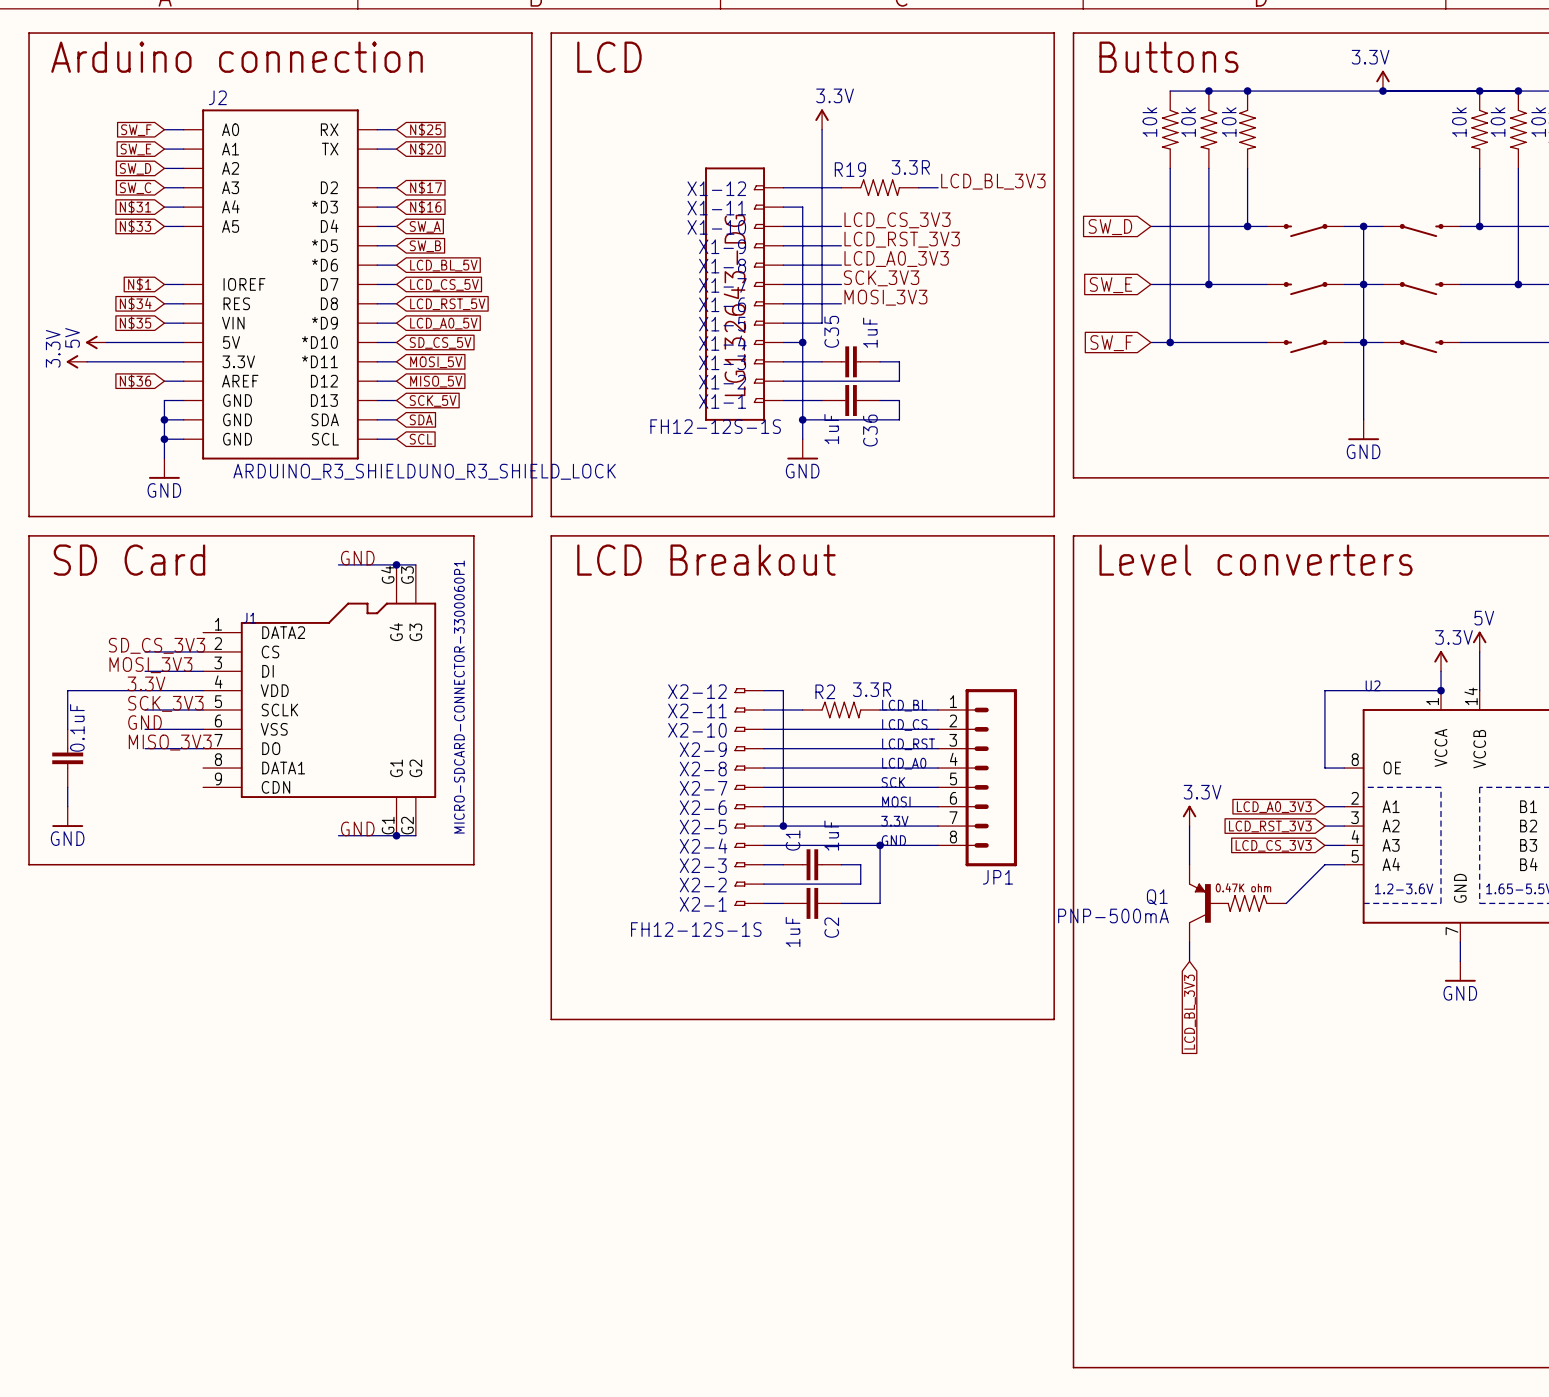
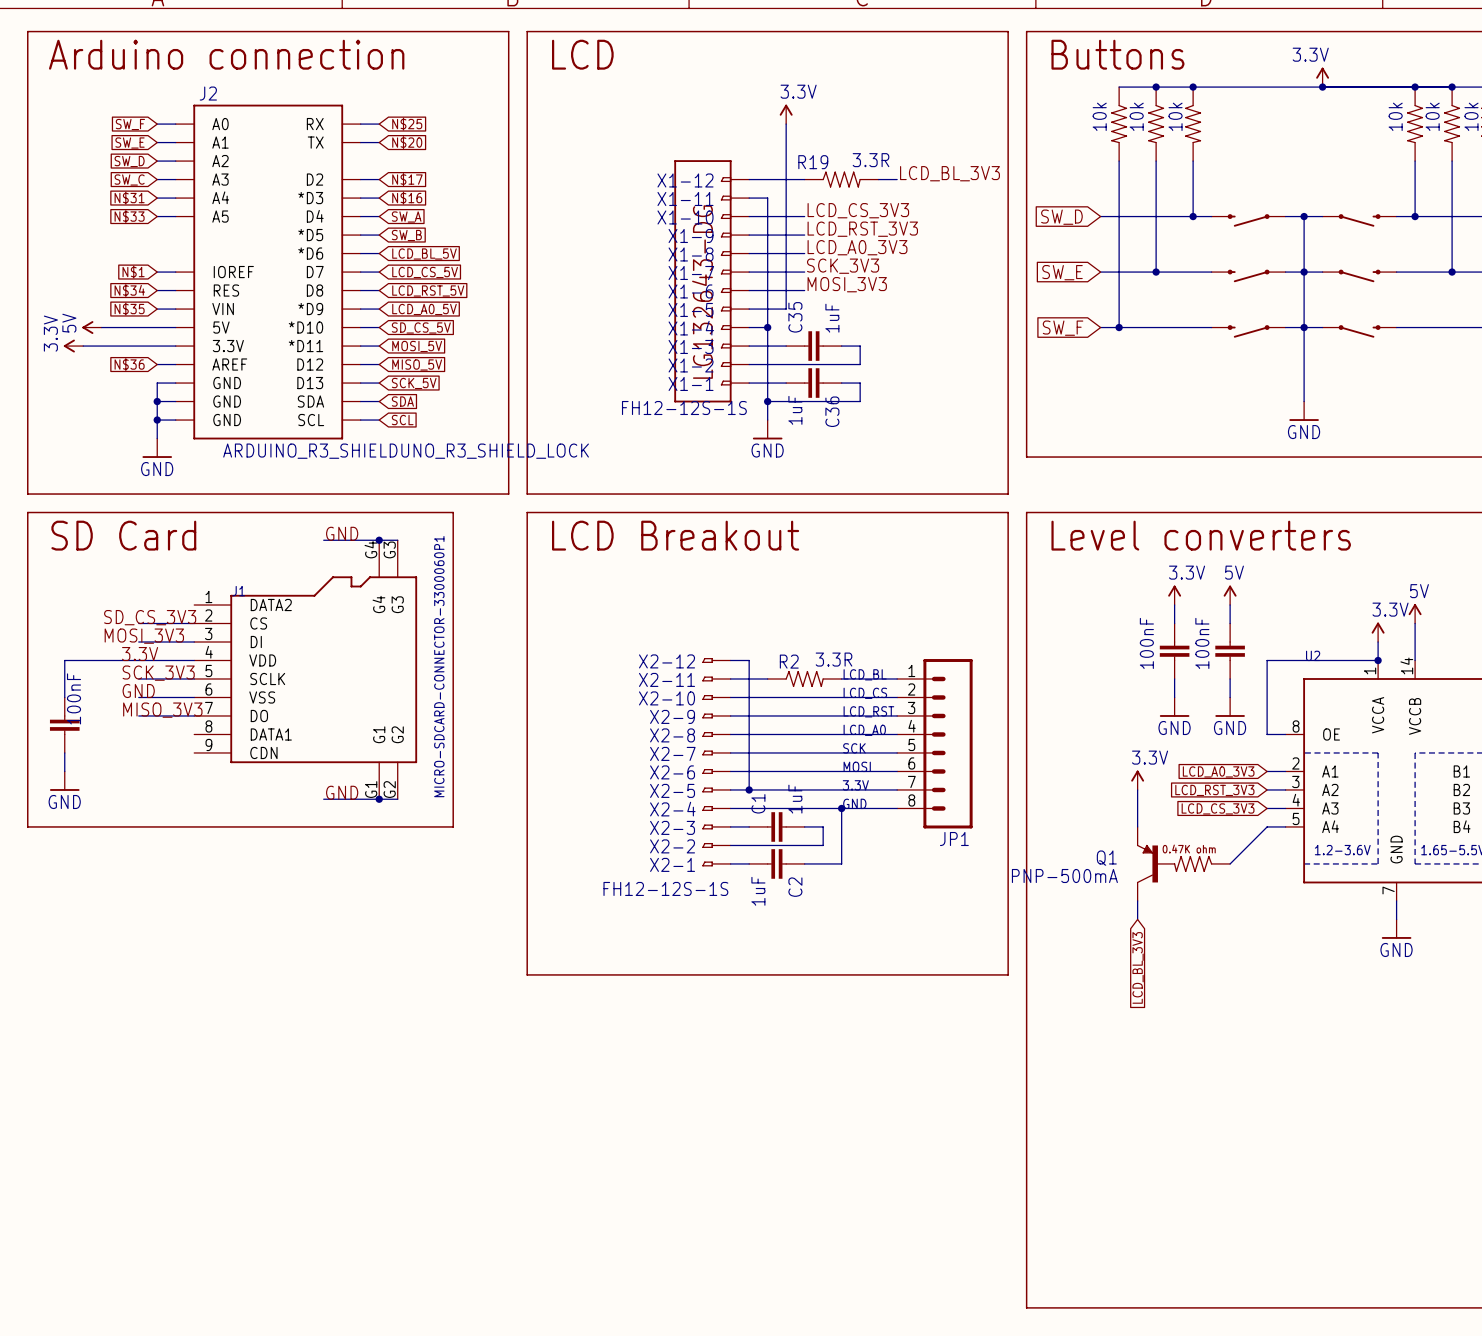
power symbol: none -> 3.3V (1174, 595)
power symbol: none -> 5V (1230, 595)
wire: none -> (1174, 605) (1174, 623)
wire: none -> (1230, 605) (1230, 623)
part: none -> 100nF (1174, 651)
part: none -> 100nF (1230, 651)
wire: none -> (1174, 678) (1174, 697)
wire: none -> (1230, 678) (1230, 697)
part value: 0.1uF (77, 727) -> 100nF (74, 698)
power symbol: none -> GND (1174, 707)
power symbol: none -> GND (1230, 707)

